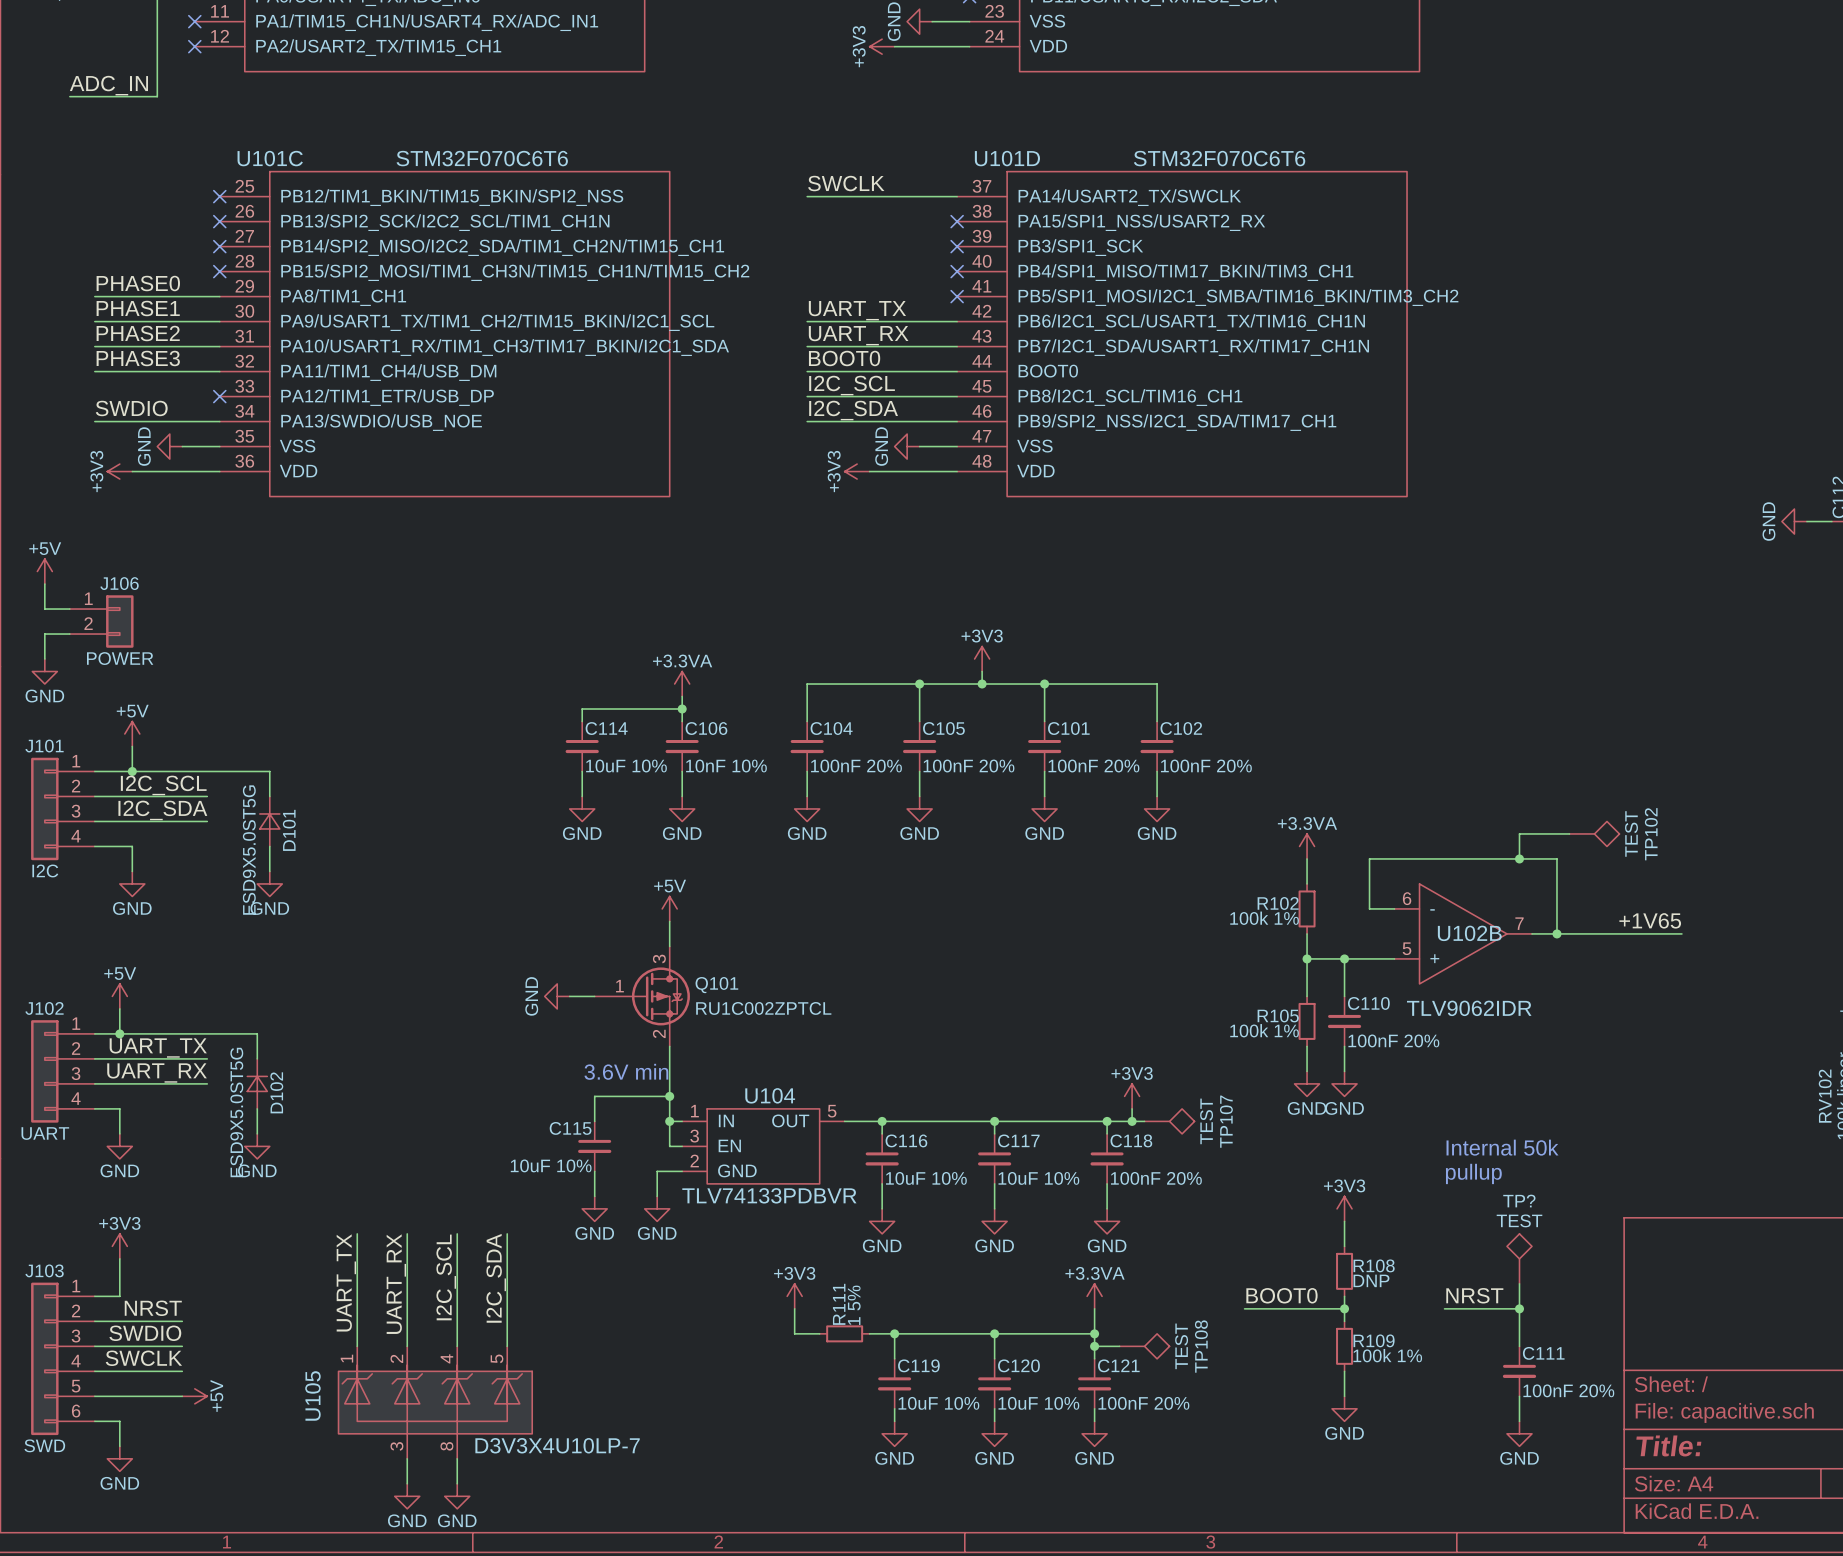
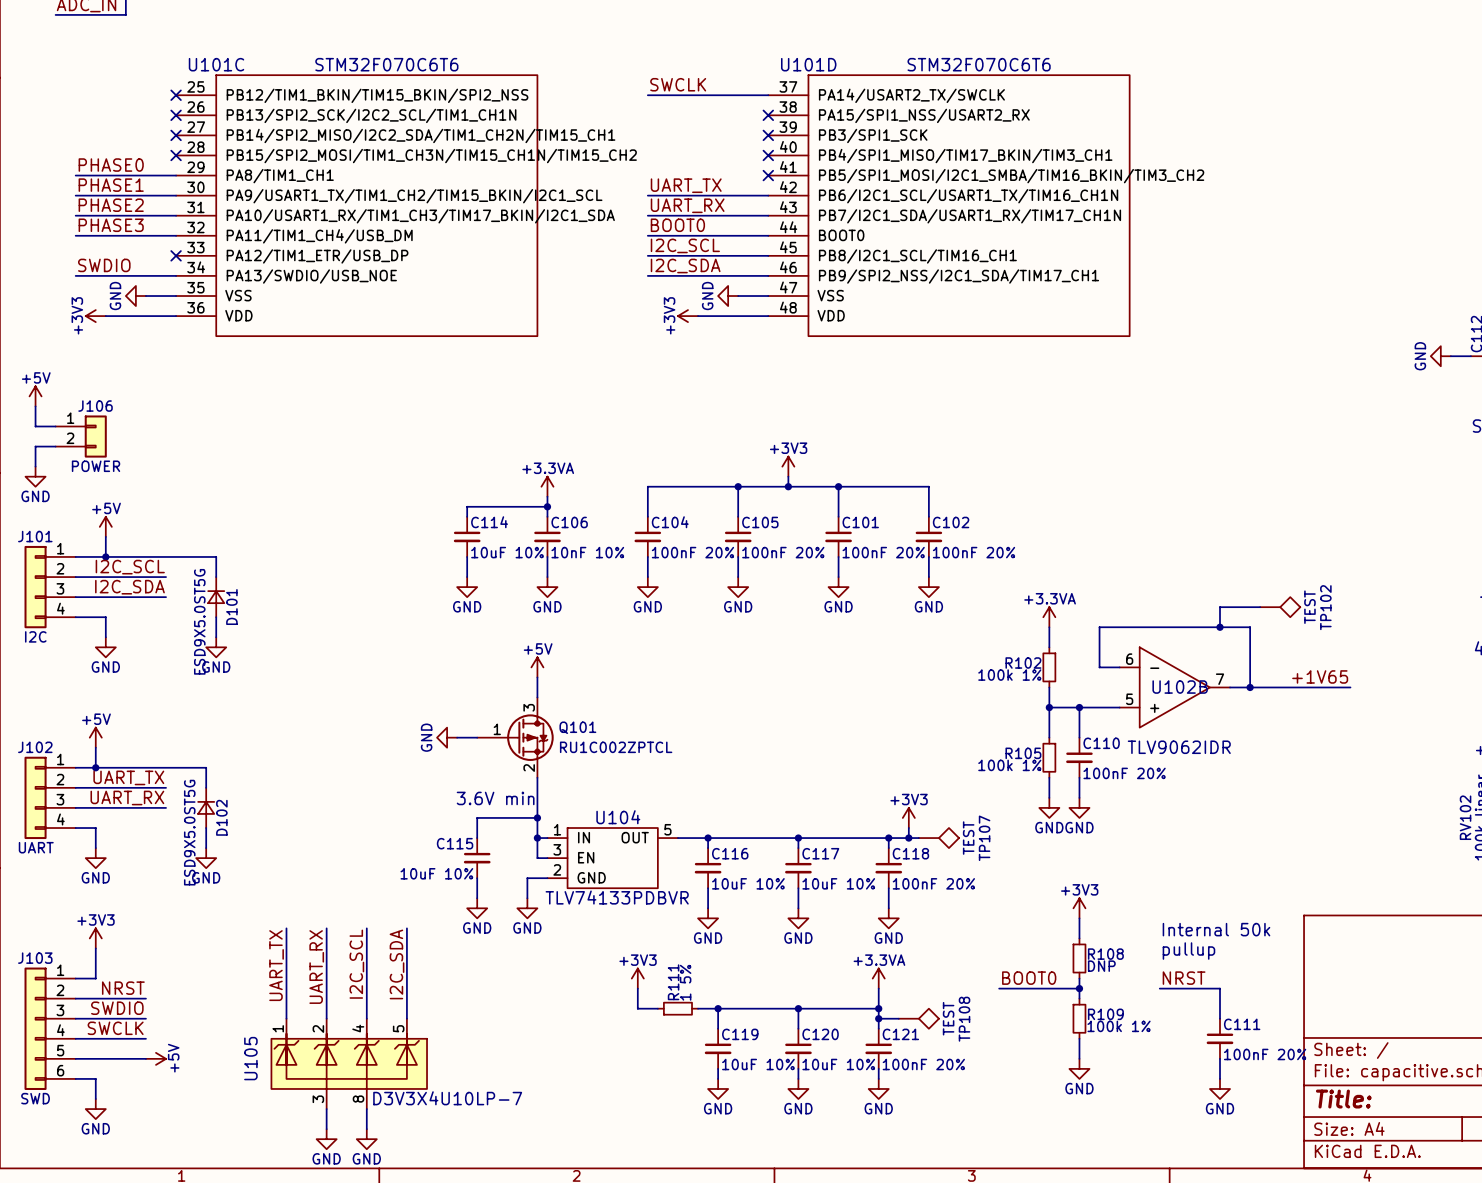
text position: Internal 50k (1502, 1147) -> Internal 50k (1216, 929)
text position: pullup (1473, 1173) -> pullup (1188, 951)
TP?: TEST (1519, 1258) -> none
wire: (1519, 1283) (1519, 1308) -> none
junction: (1519, 1308) -> none

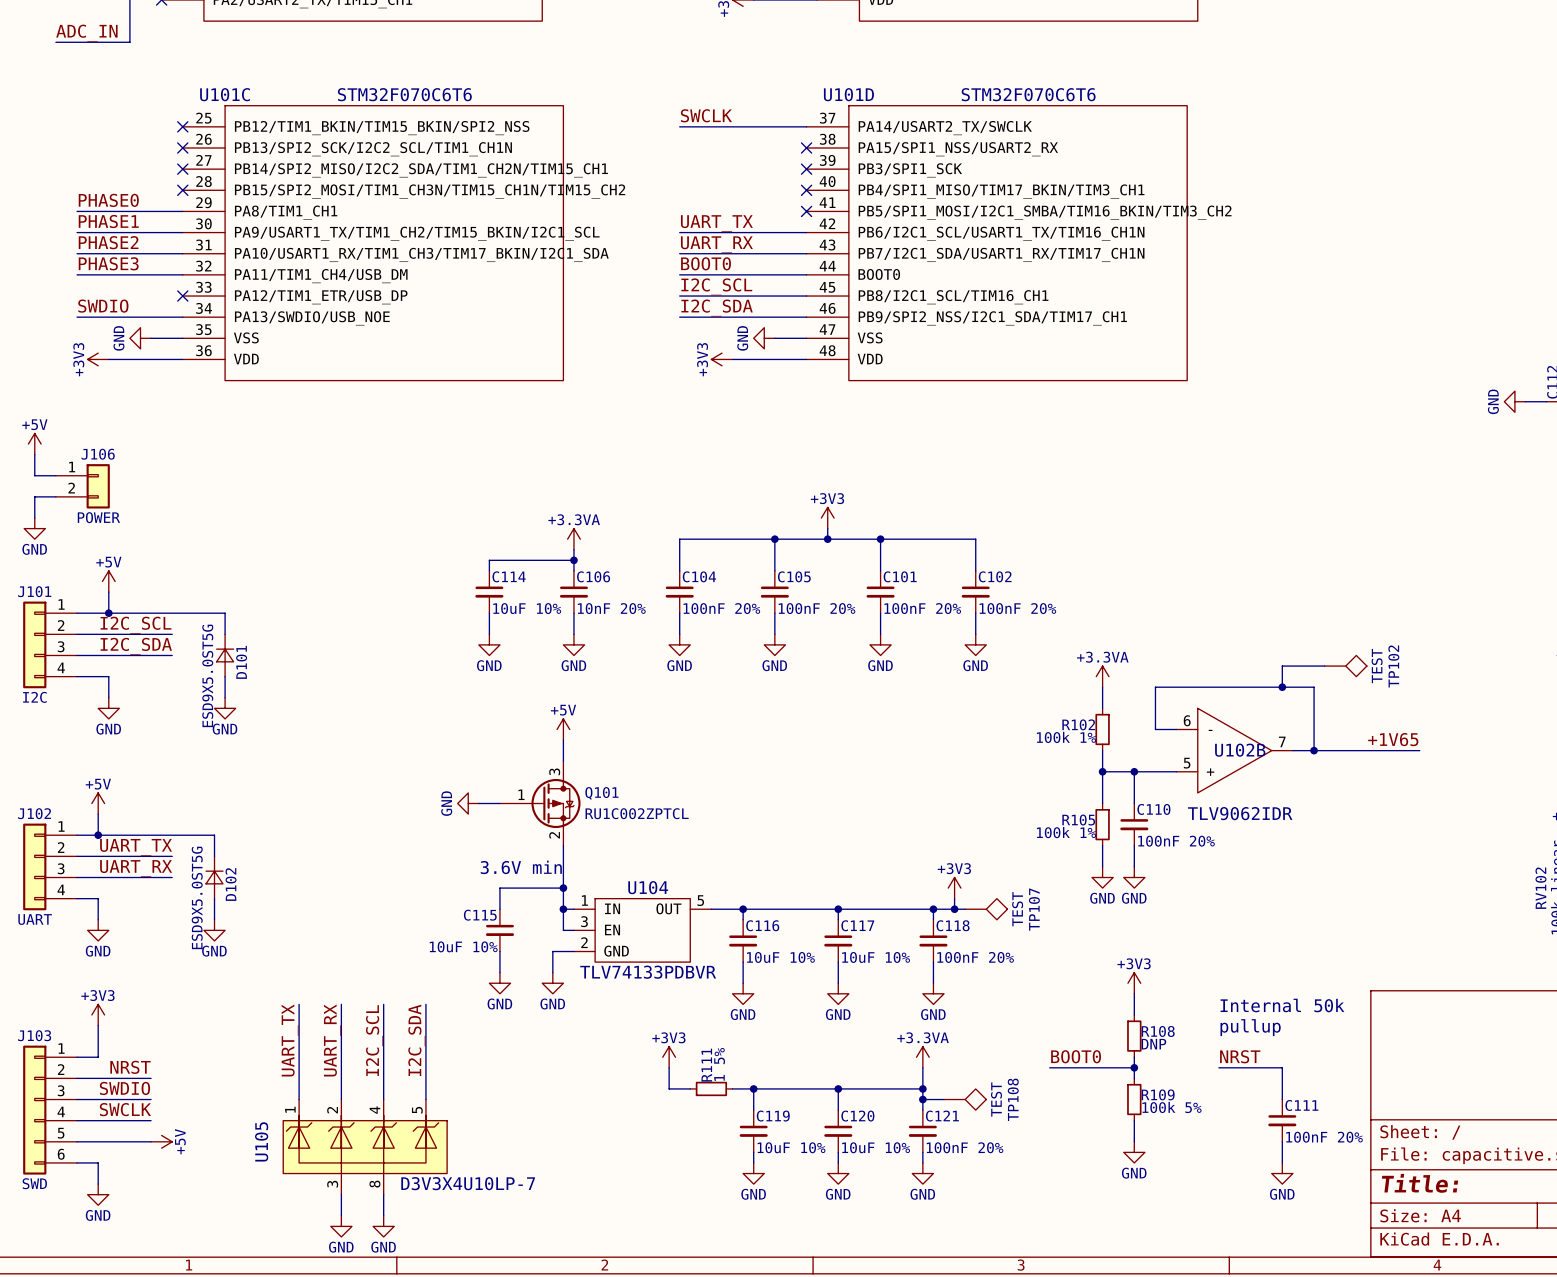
C106 value: 10nF 10% (587, 552) -> 10nF 20% (611, 608)
R109 value: 100k 1% (1119, 1026) -> 100k 5% (1171, 1107)

